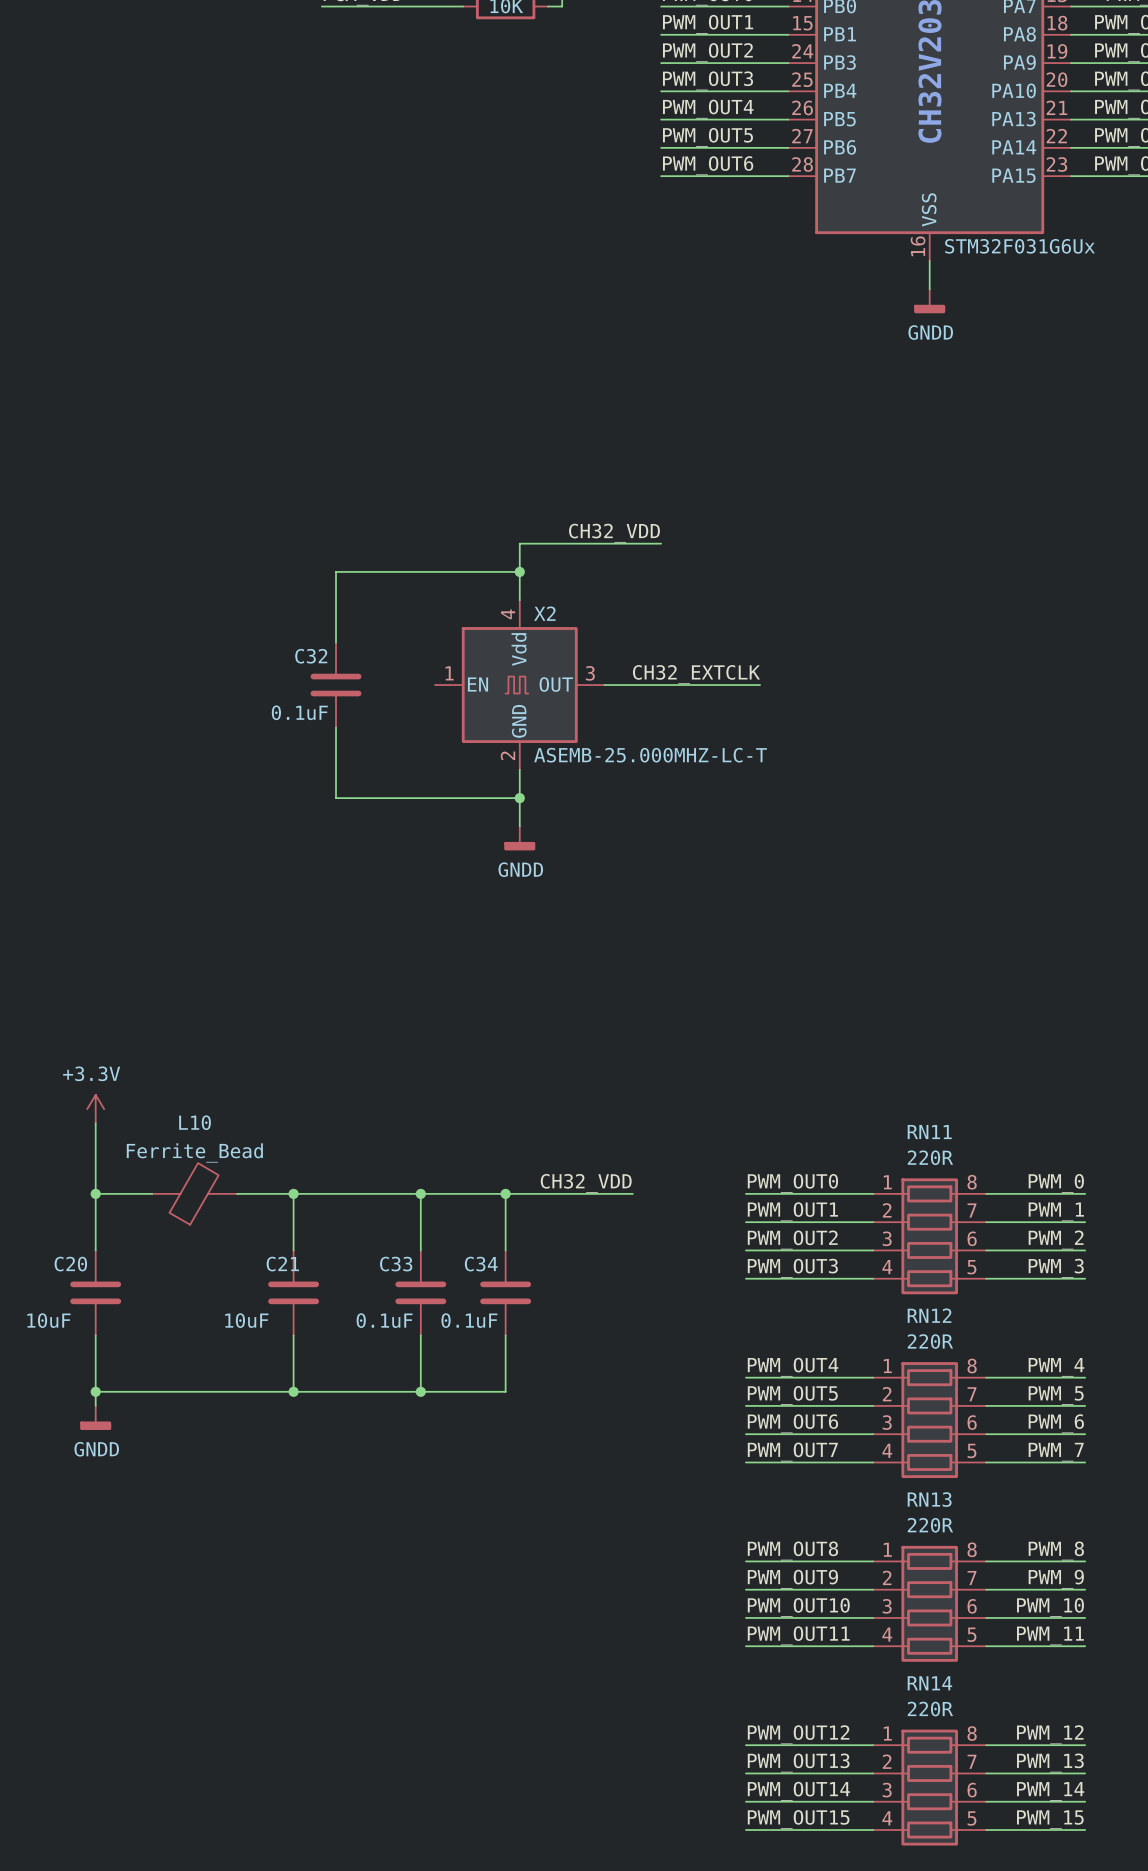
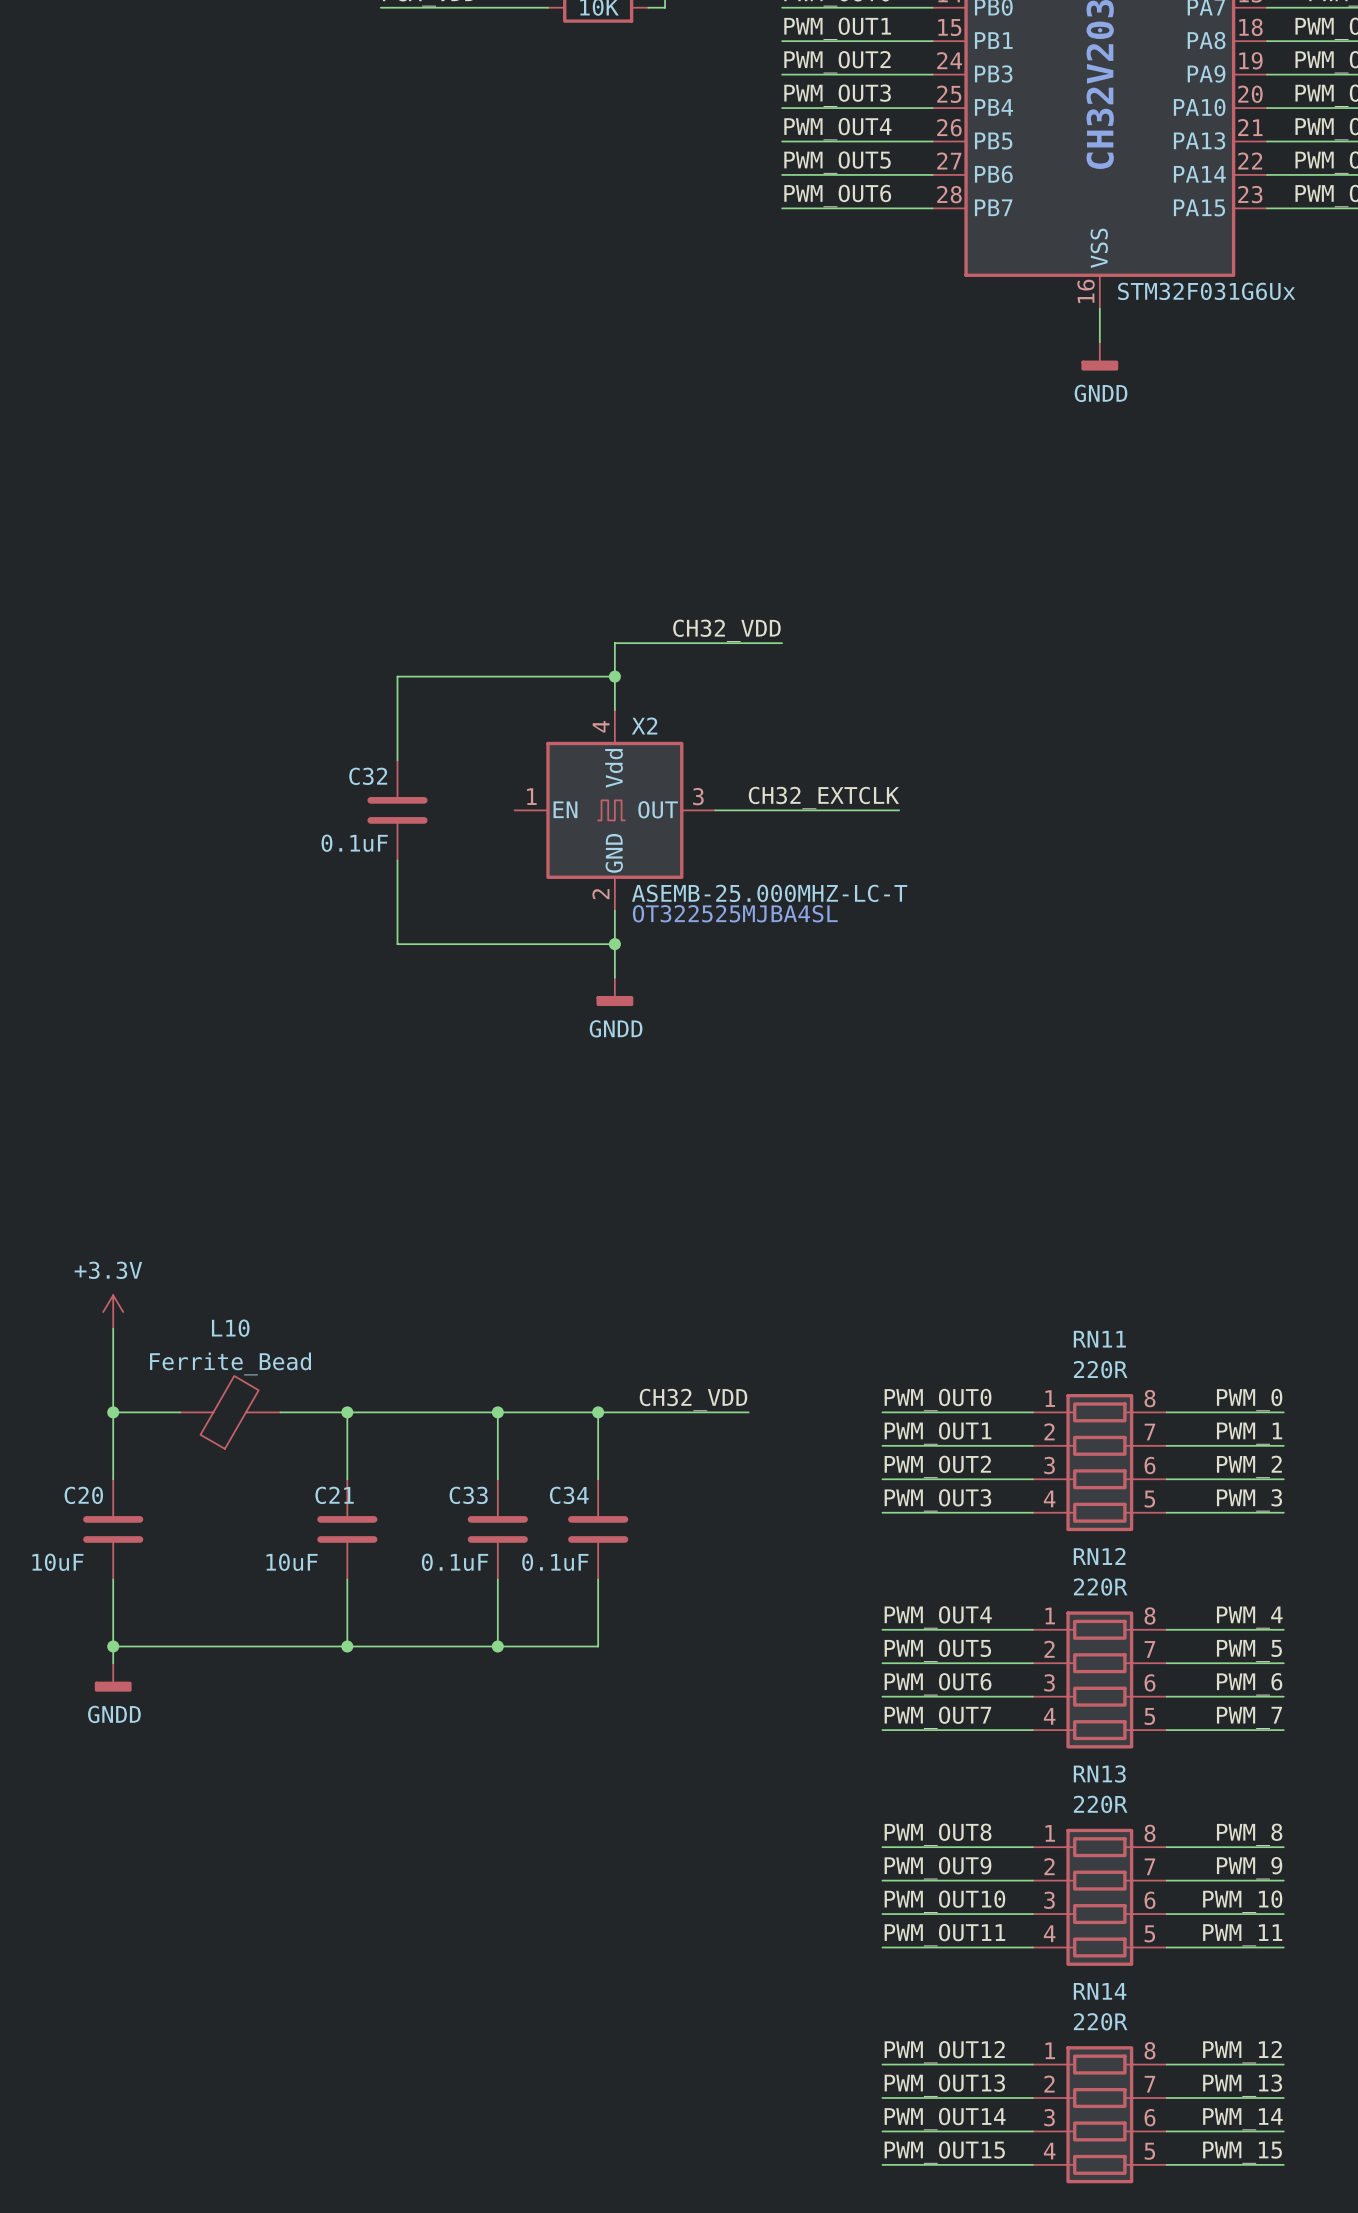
text: none -> OT322525MJBA4SL (735, 913)

